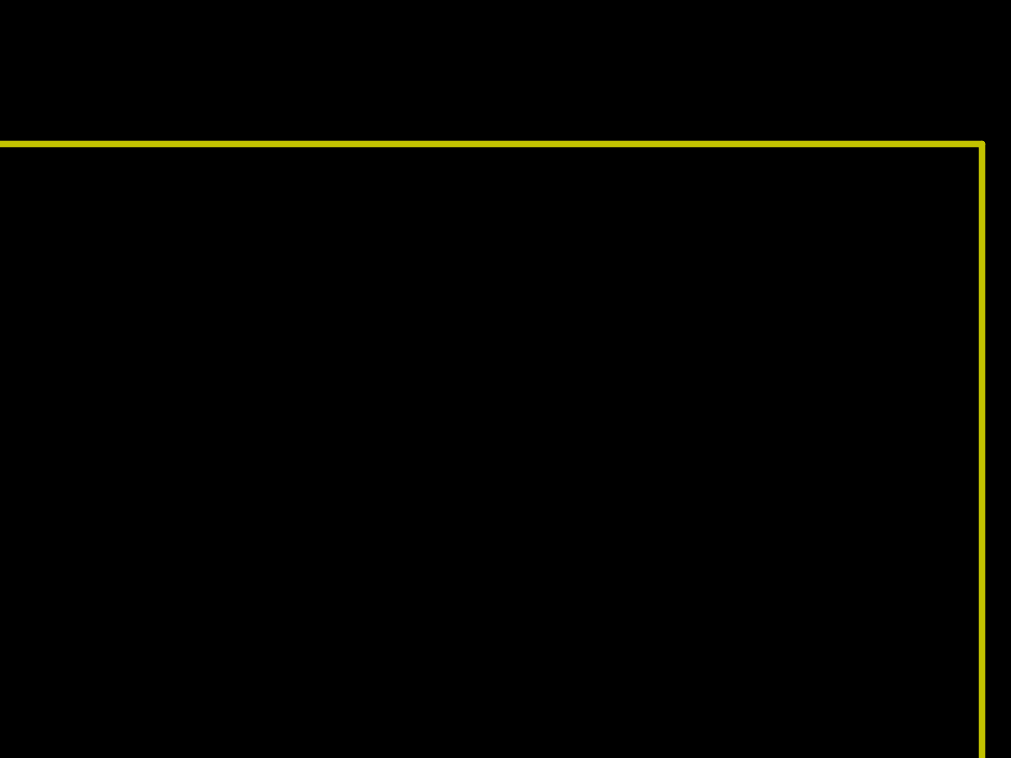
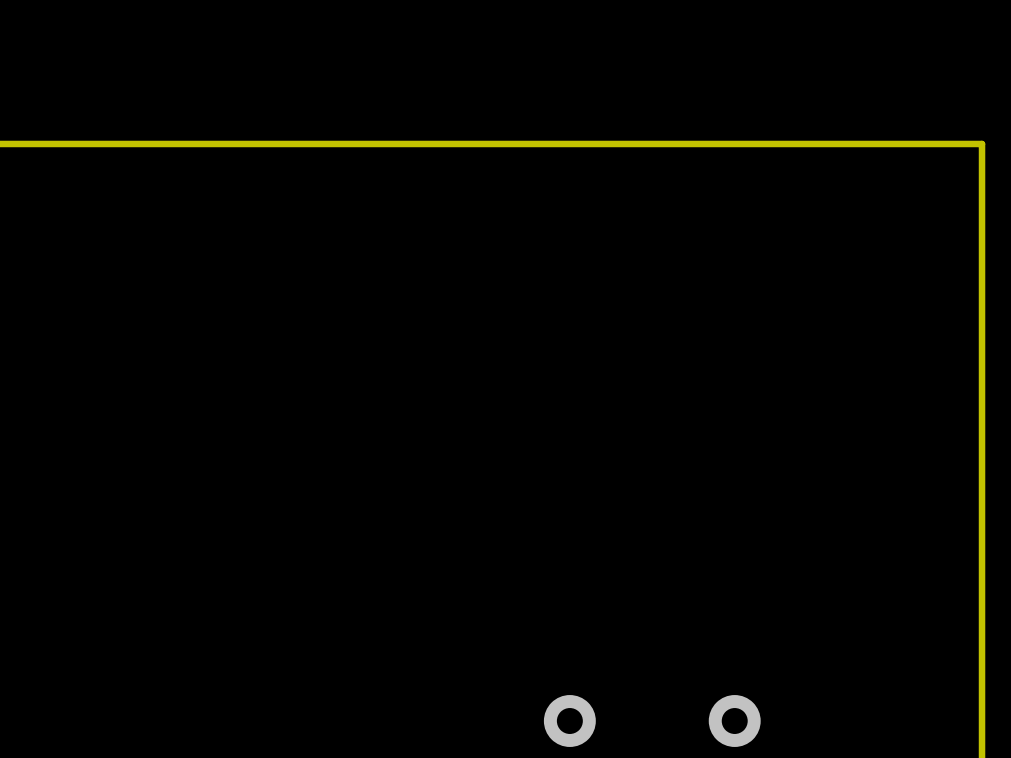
via: none -> (569, 721)
via: none -> (734, 721)

